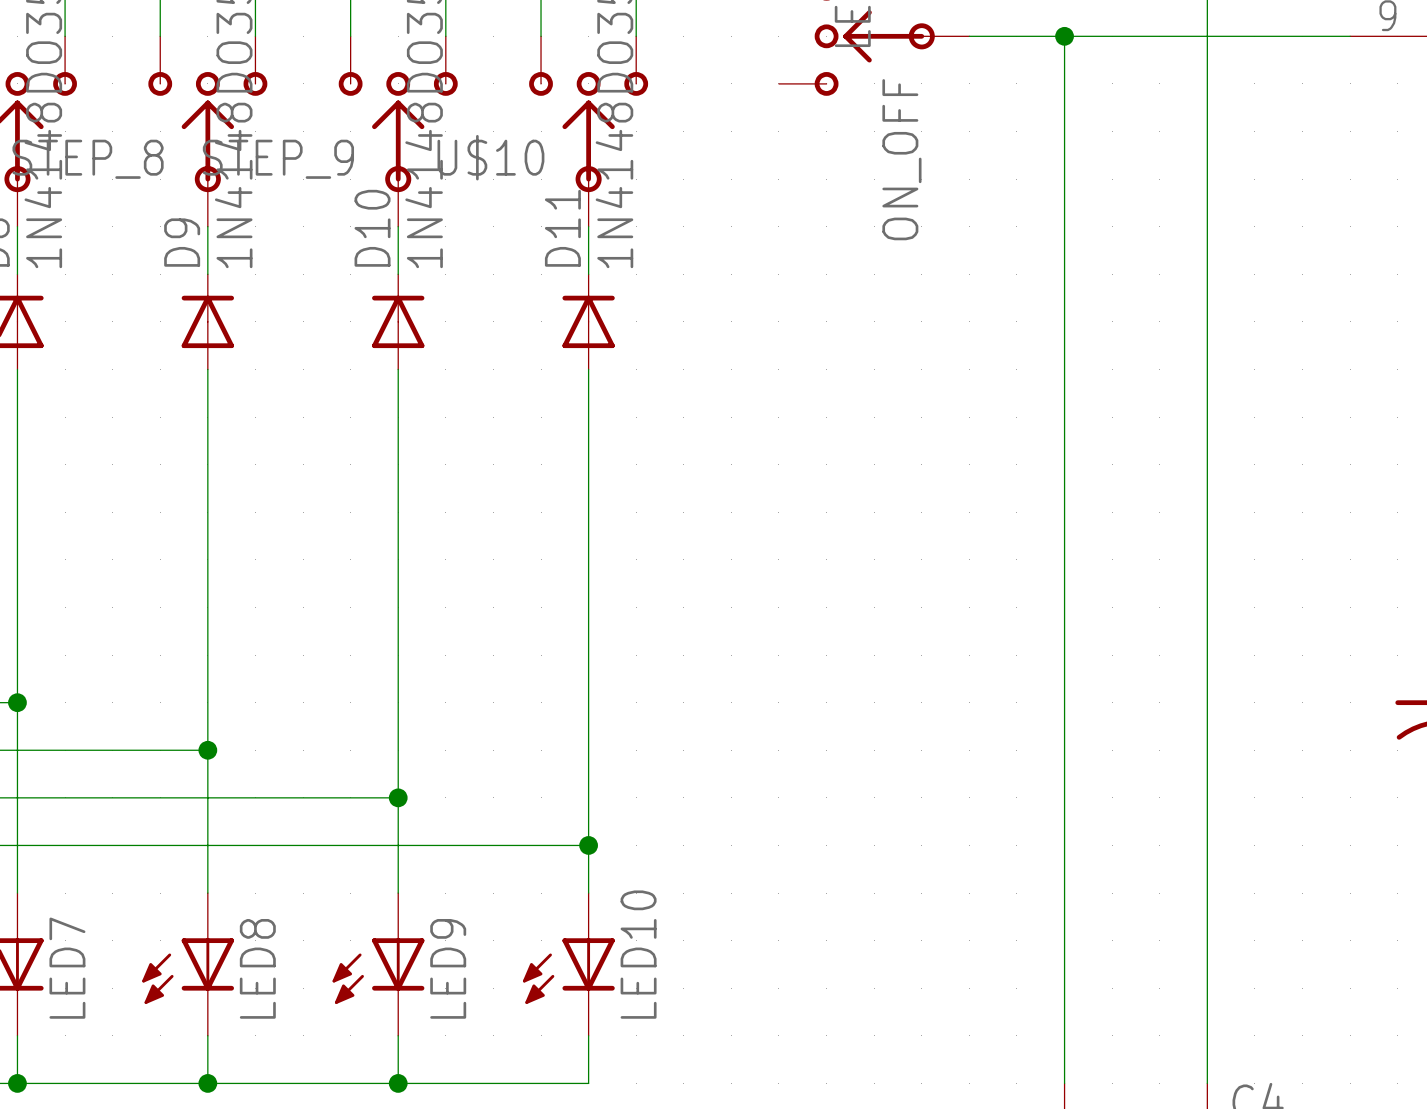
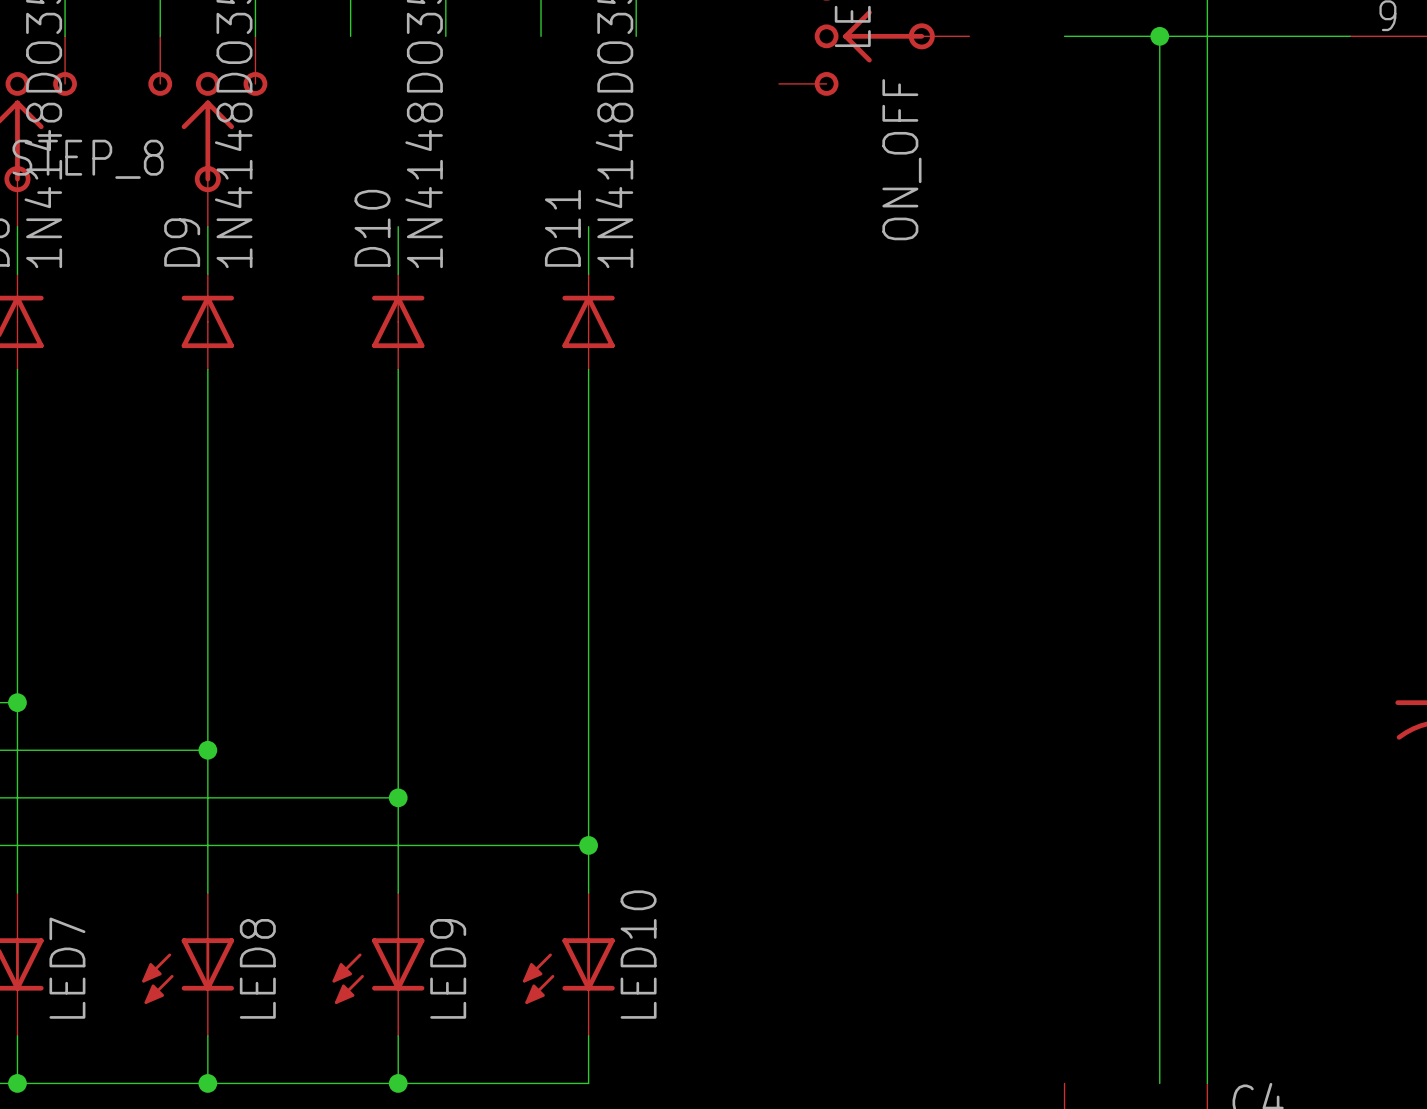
wire: (969, 36) (1064, 36) (1064, 1083) -> none
junction: (1064, 36) -> none
wire: none -> (1159, 36) (1159, 1083)
junction: none -> (1159, 36)
STEP_9: (398, 131) -> none
U$10: (588, 131) -> none

